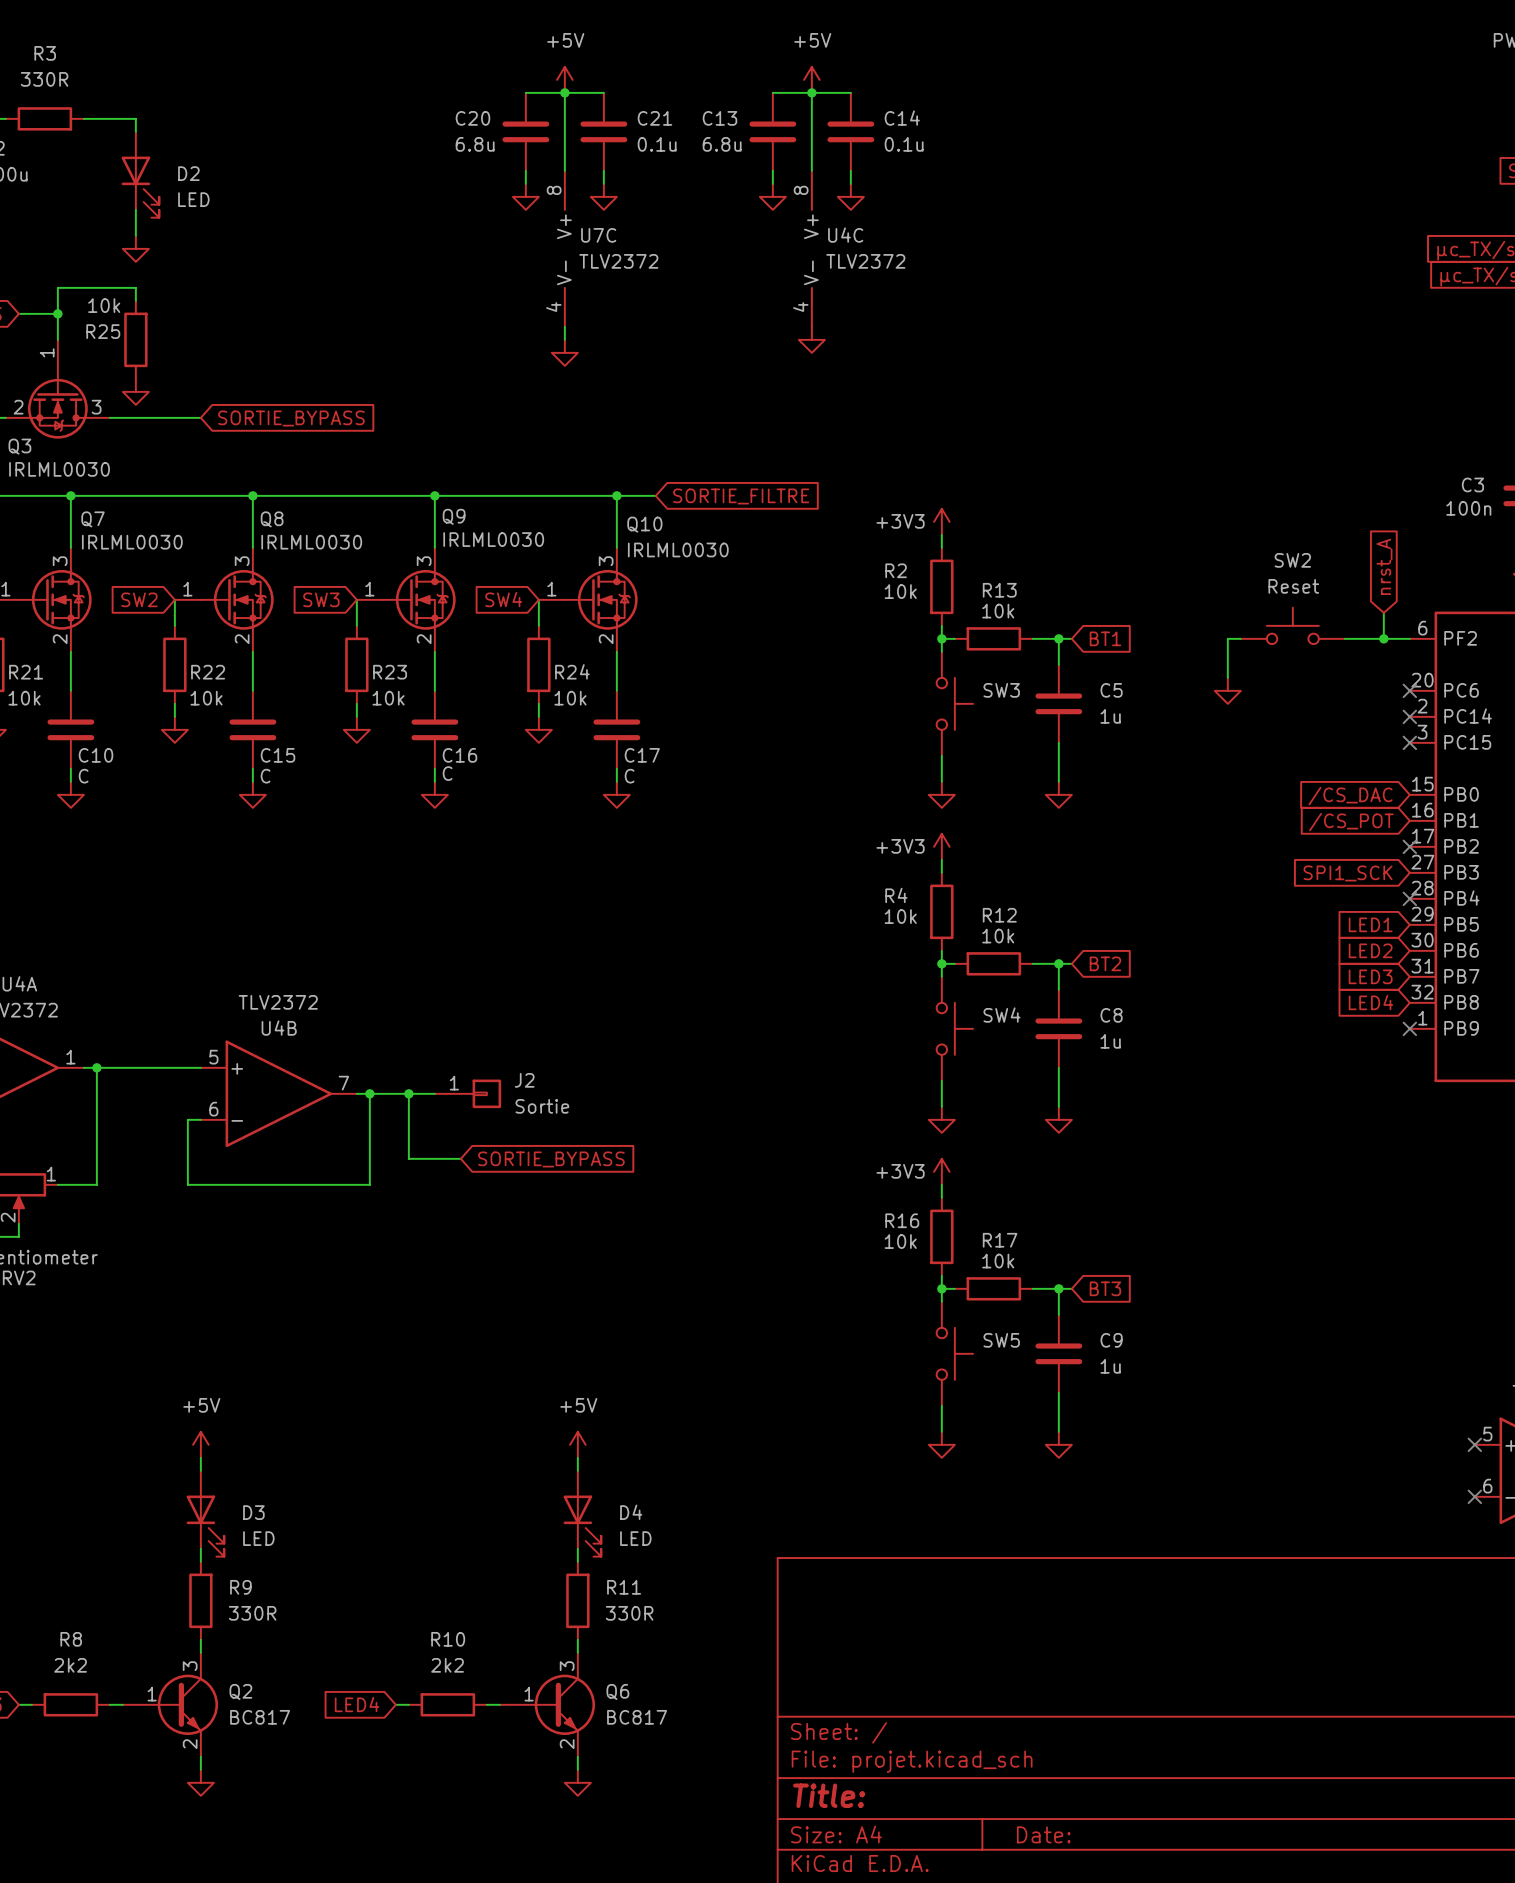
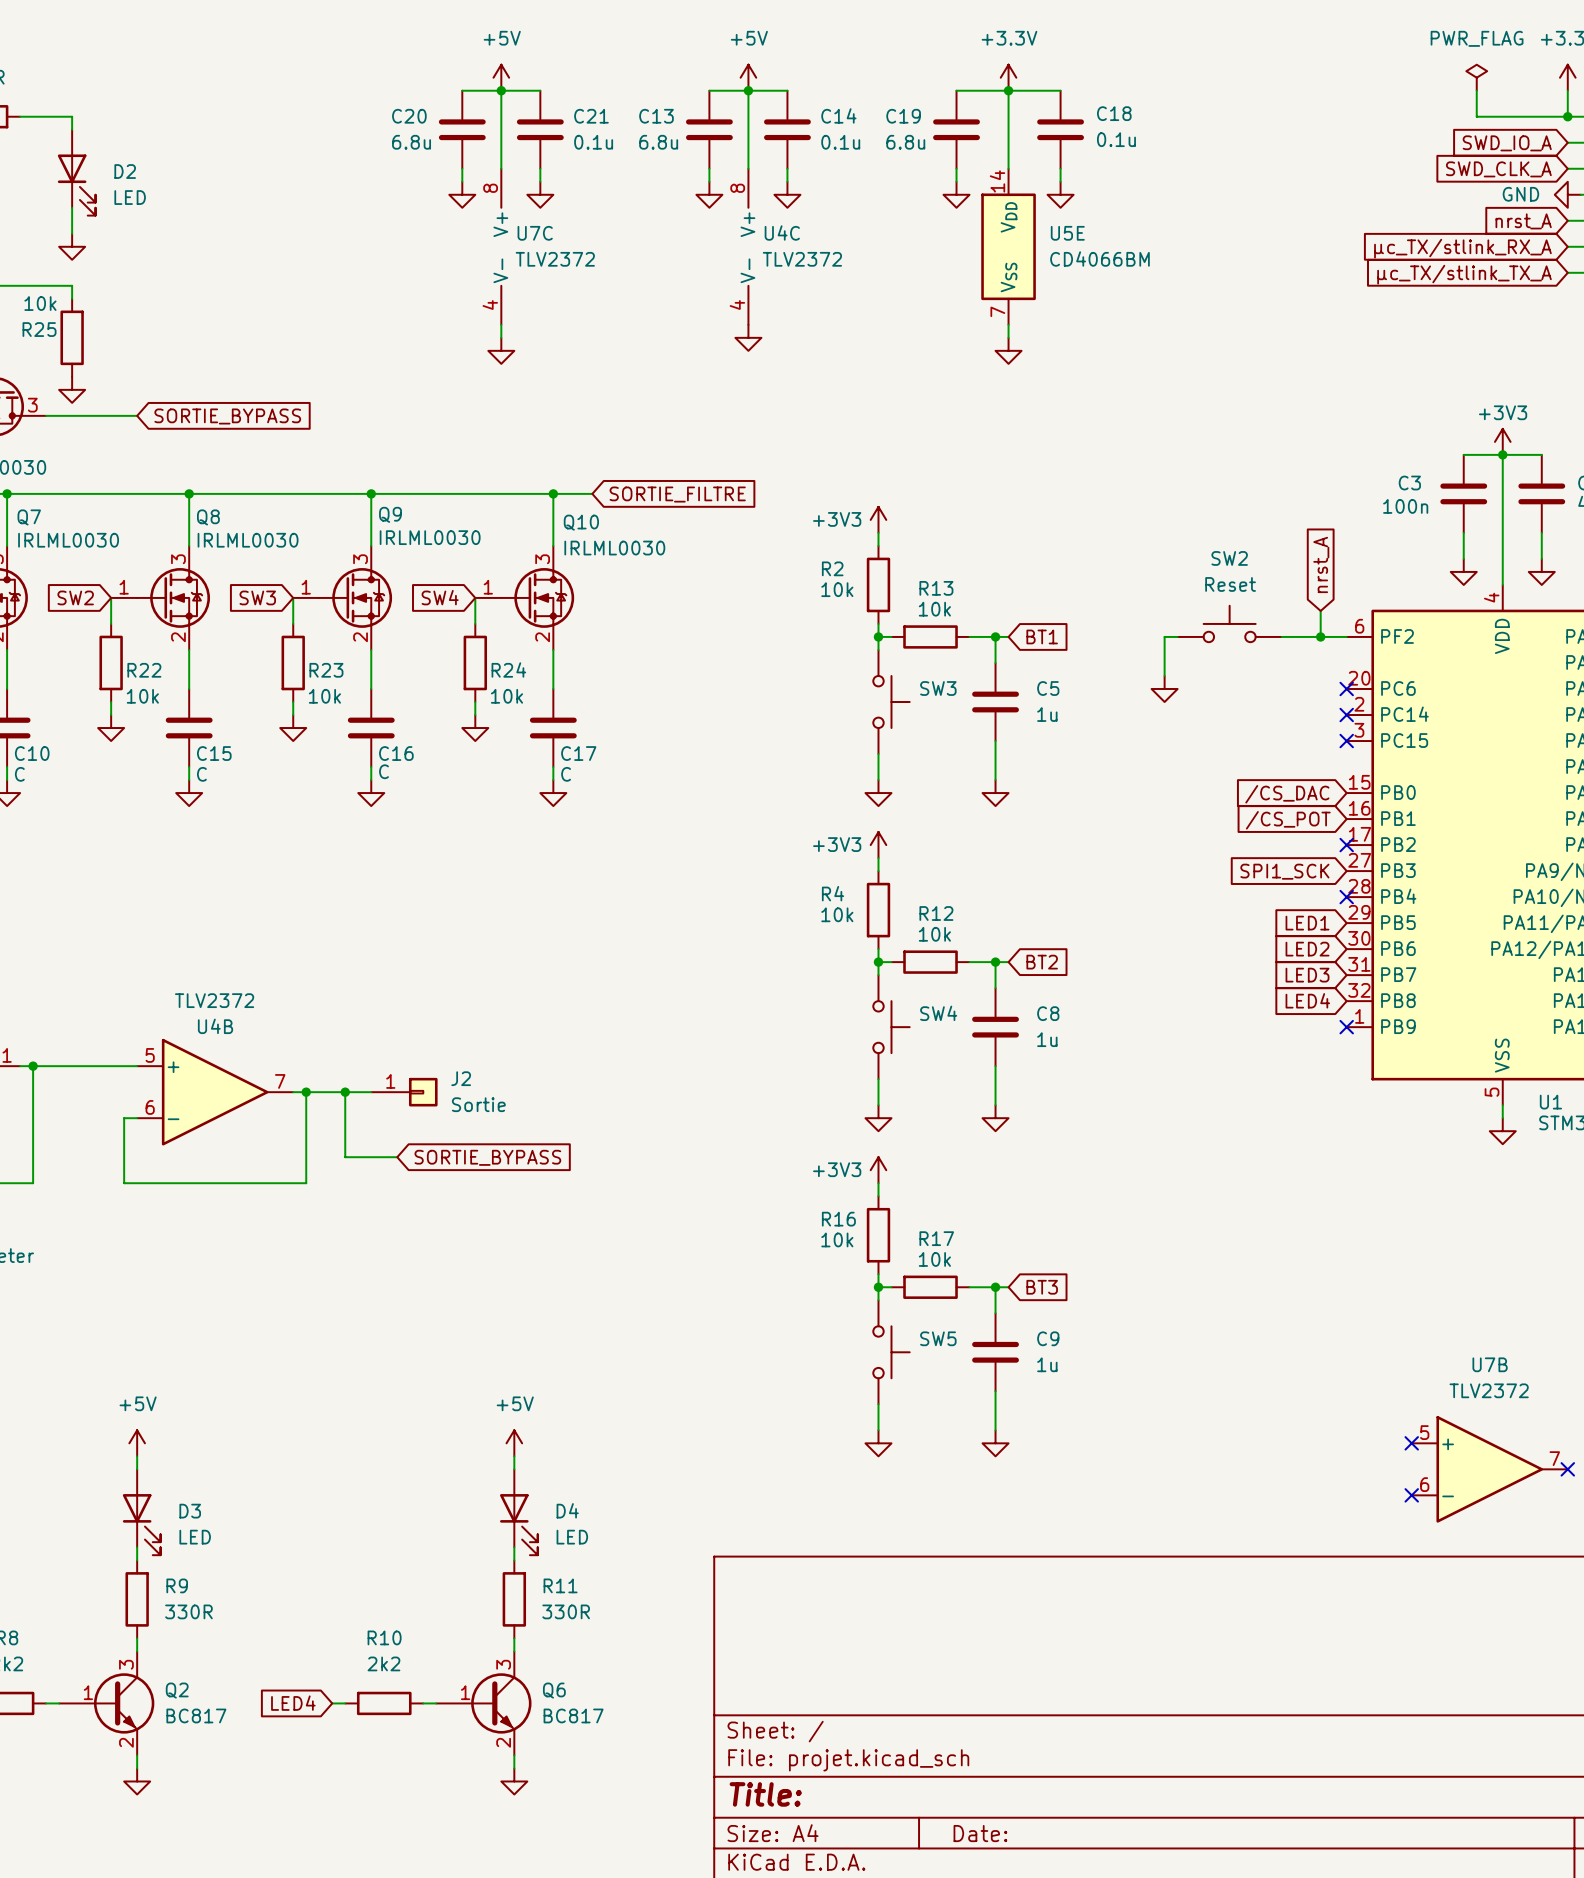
power symbol: none -> +3.3V (1008, 77)
wire: none -> (956, 90) (1060, 90)
wire: none -> (1008, 90) (1008, 168)
junction: none -> (1008, 90)
C19: none -> 6.8u (956, 129)
C18: none -> 0.1u (1060, 129)
wire: none -> (956, 168) (956, 181)
wire: none -> (1060, 168) (1060, 181)
power symbol: none -> (956, 194)
power symbol: none -> (1060, 194)
U5E: none -> CD4066BM (1008, 246)
wire: none -> (1008, 324) (1008, 337)
power symbol: none -> (1008, 350)

